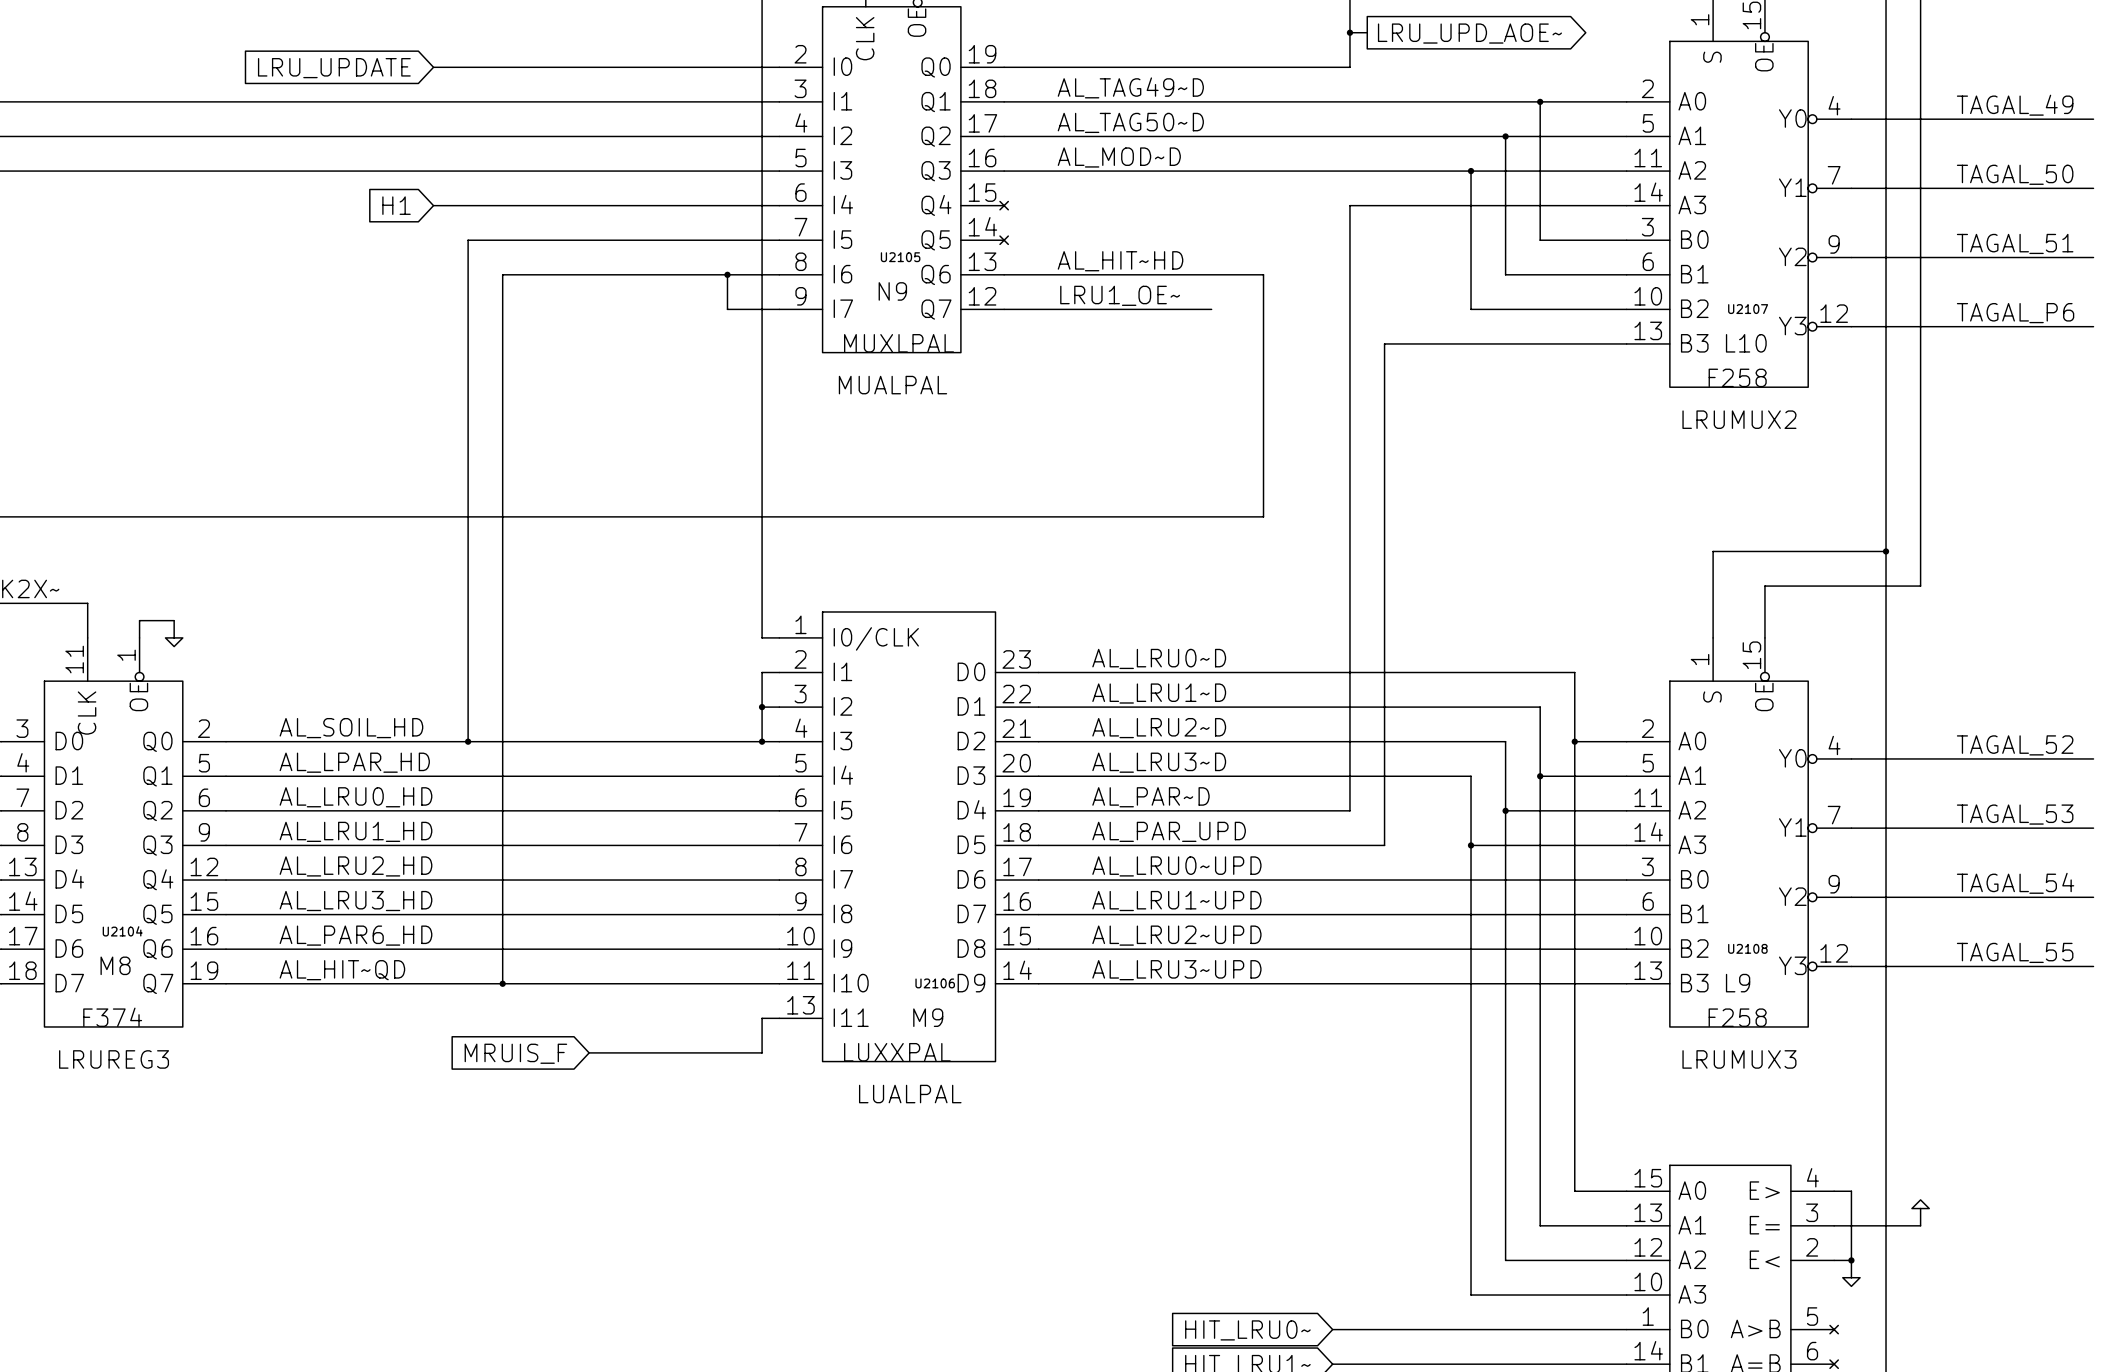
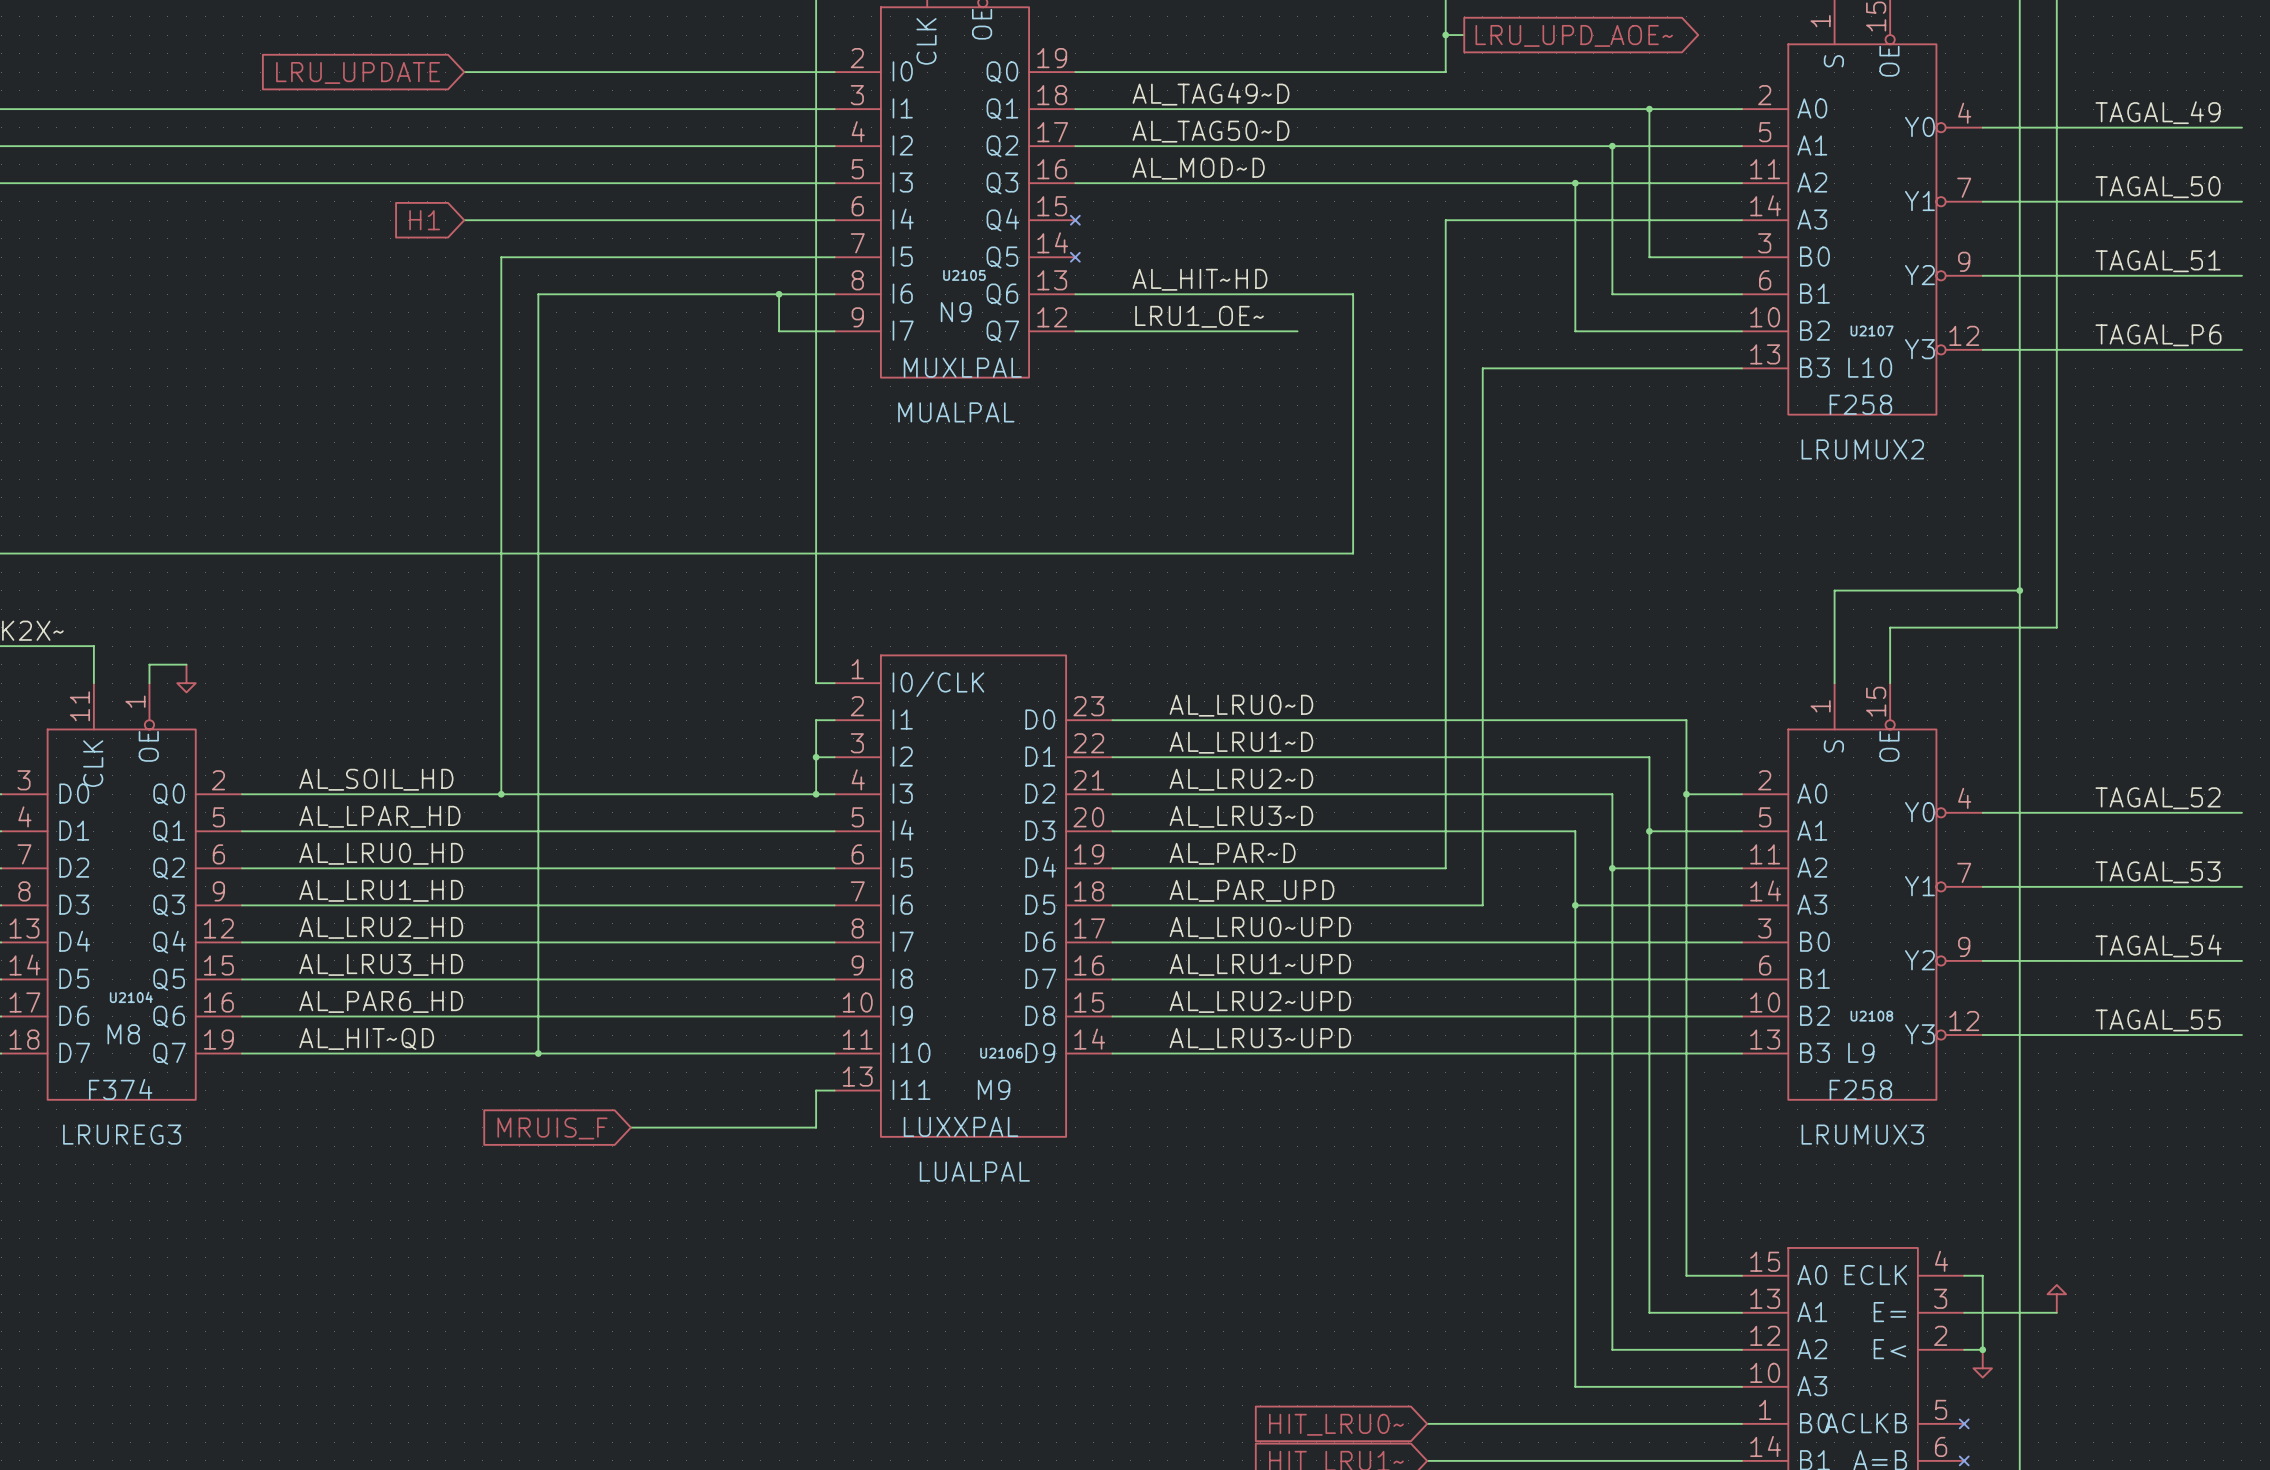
part pin name: E> (1764, 1190) -> ECLK (1875, 1275)
part pin name: A>B (1755, 1328) -> ACLKB (1865, 1423)

